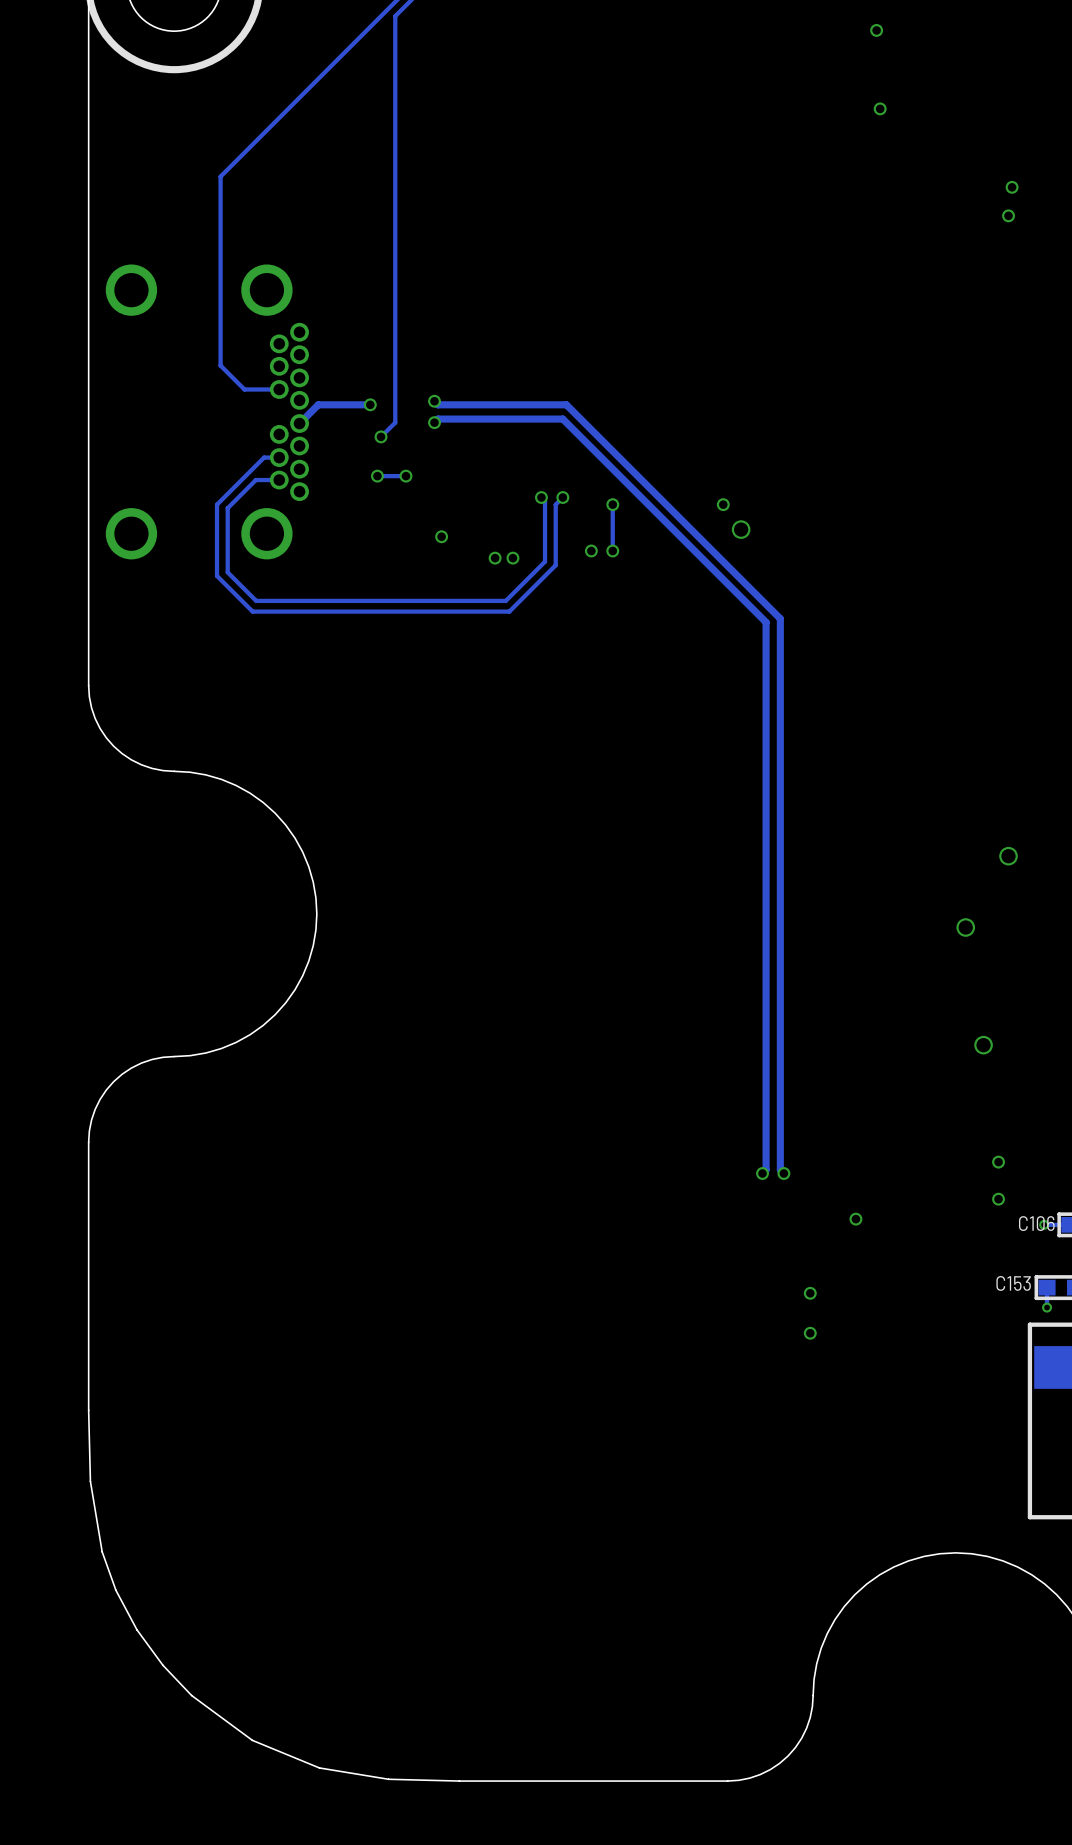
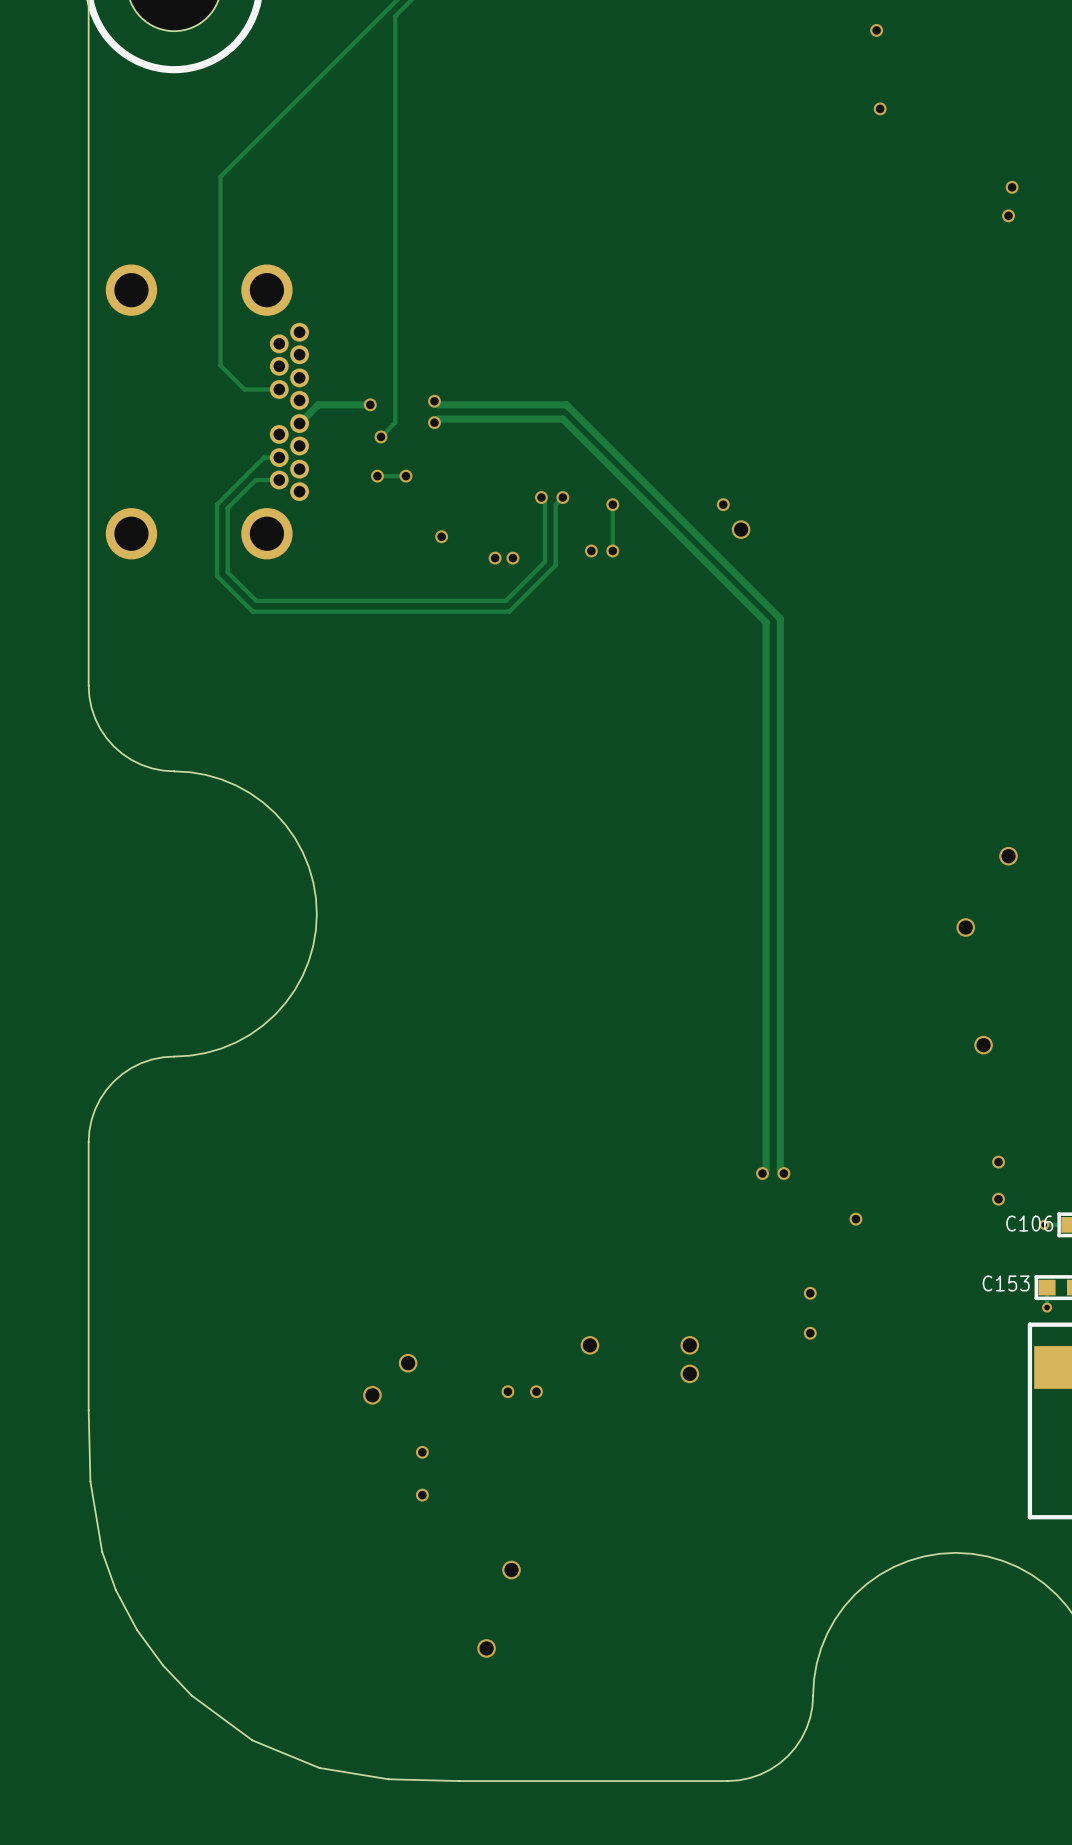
via: none -> (589, 1345)
via: none -> (689, 1345)
via: none -> (408, 1363)
via: none -> (689, 1373)
via: none -> (507, 1391)
via: none -> (536, 1391)
via: none -> (372, 1395)
via: none -> (422, 1452)
via: none -> (422, 1495)
via: none -> (511, 1569)
via: none -> (486, 1648)

